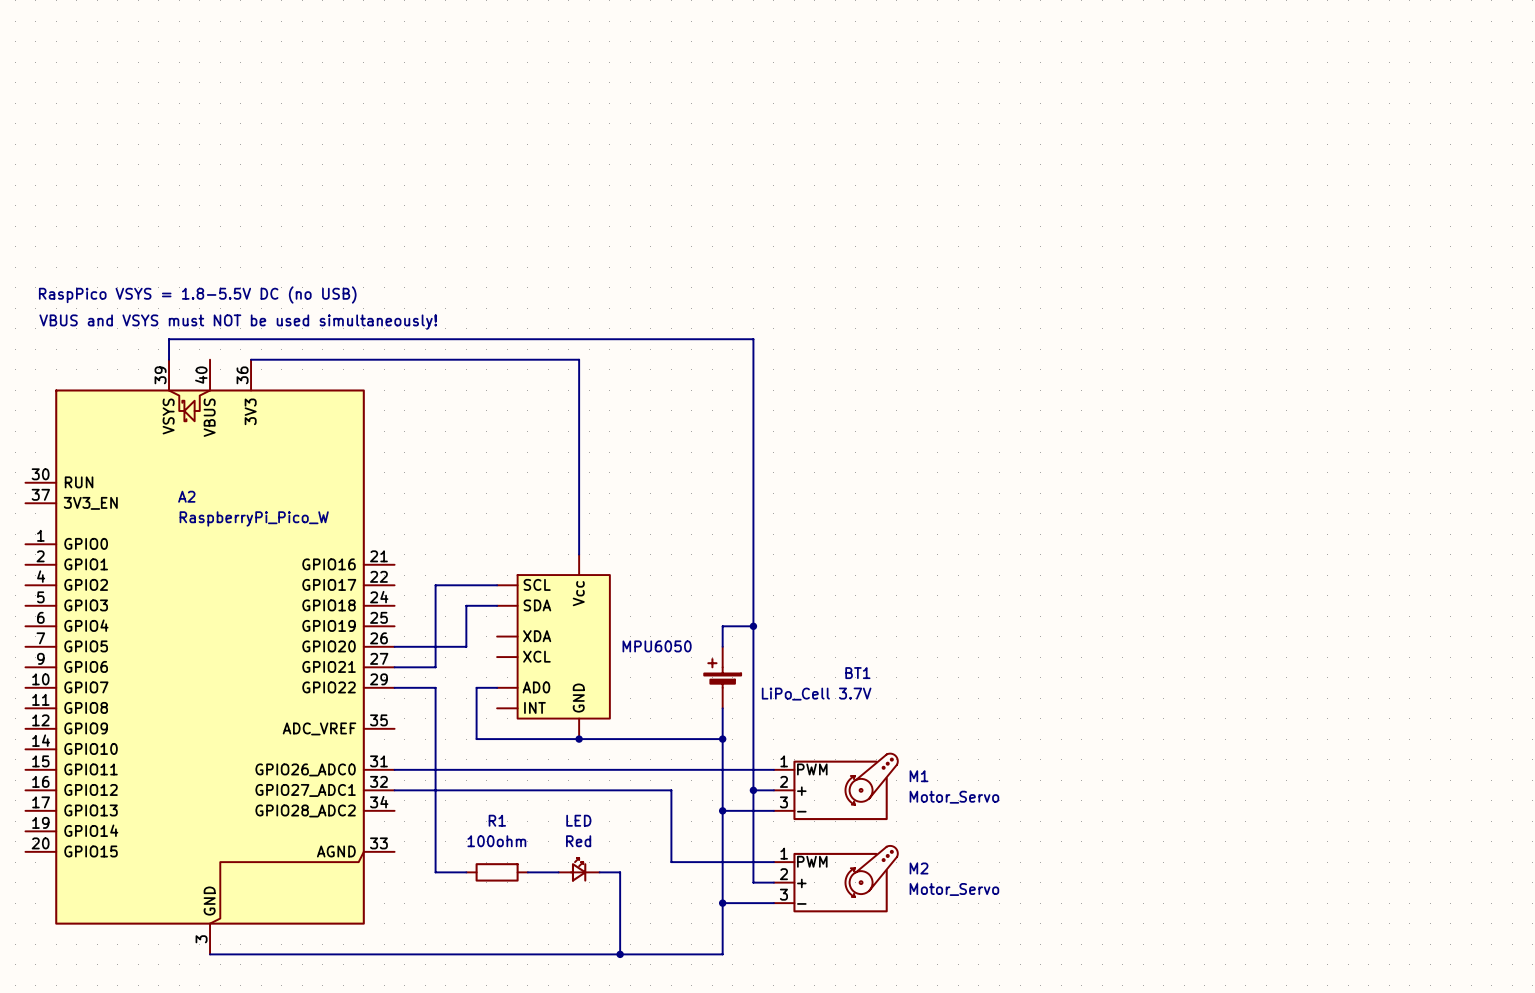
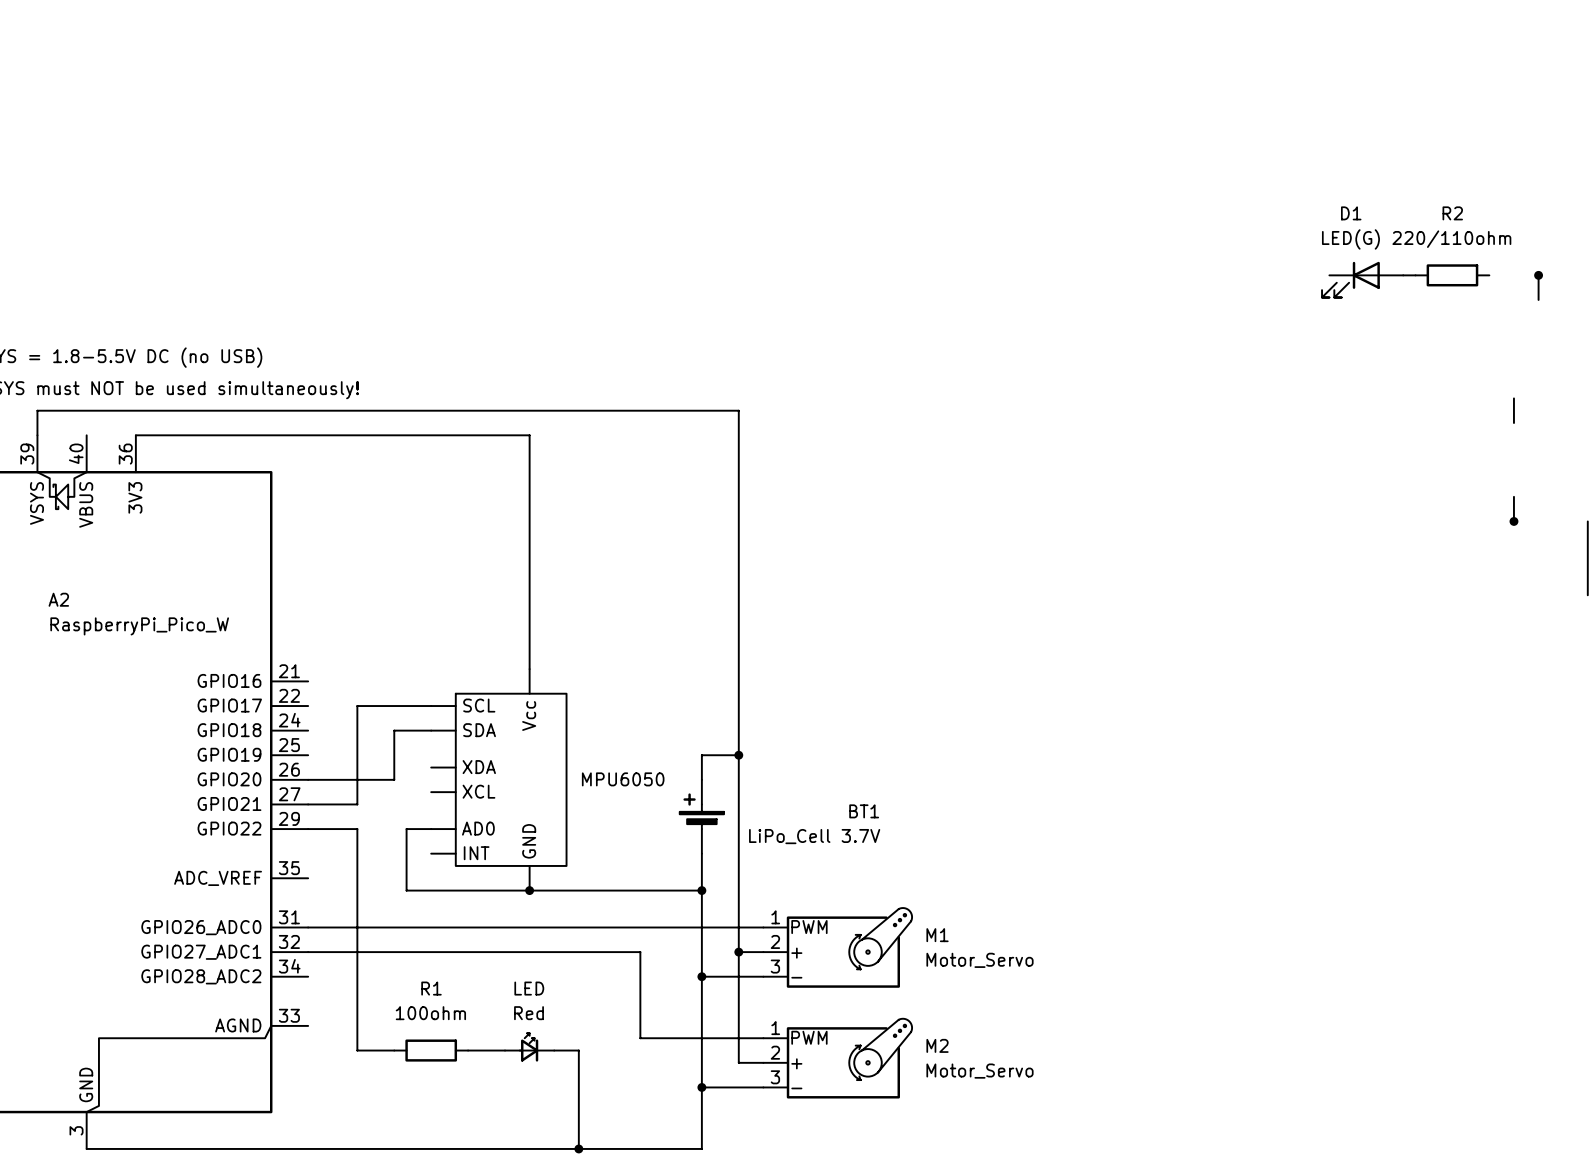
wire: none -> (1403, 275) (1415, 275)
R2: none -> 220/110ohm (1452, 275)
wire: none -> (1538, 275) (1538, 299)
junction: none -> (1538, 275)
D1: none -> LED(G) (1362, 279)
wire: none -> (1513, 398) (1513, 423)
wire: none -> (1513, 496) (1513, 521)
junction: none -> (1513, 521)
wire: none -> (1587, 521) (1587, 595)

